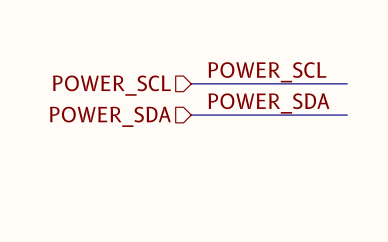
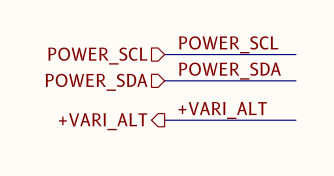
label: none -> +VARI_ALT (222, 110)
wire: none -> (164, 120) (295, 120)
hierarchical label: none -> +VARI_ALT (103, 121)

